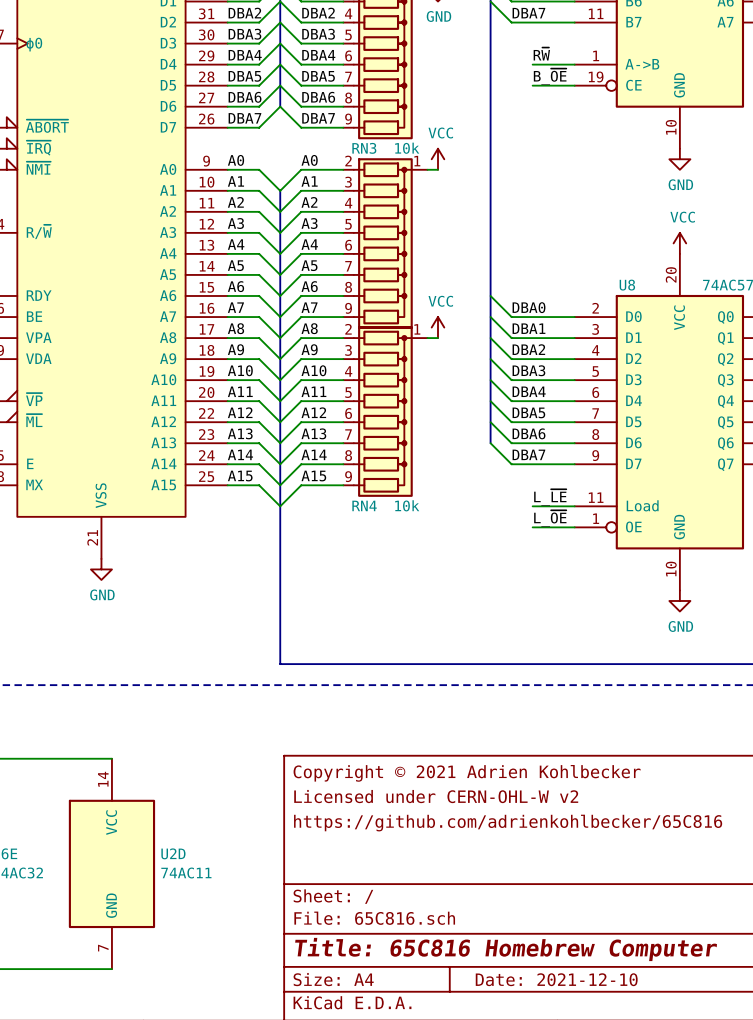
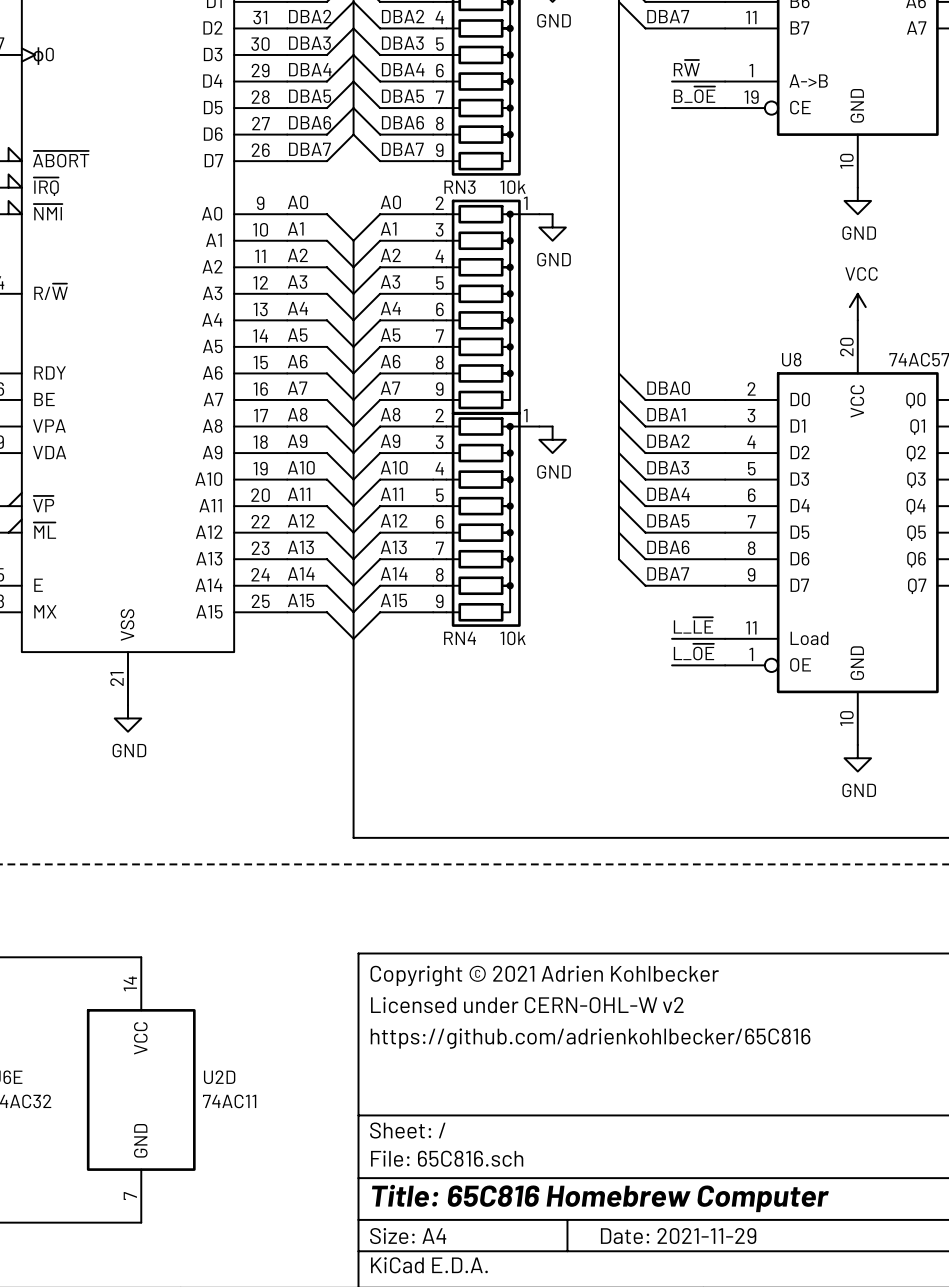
power symbol: VCC (438, 159) -> none
power symbol: none -> GND (552, 227)
power symbol: VCC (438, 327) -> none
power symbol: none -> GND (552, 439)
title block: Date: 2021-12-10 (556, 979) -> Date: 2021-11-29 (678, 1236)

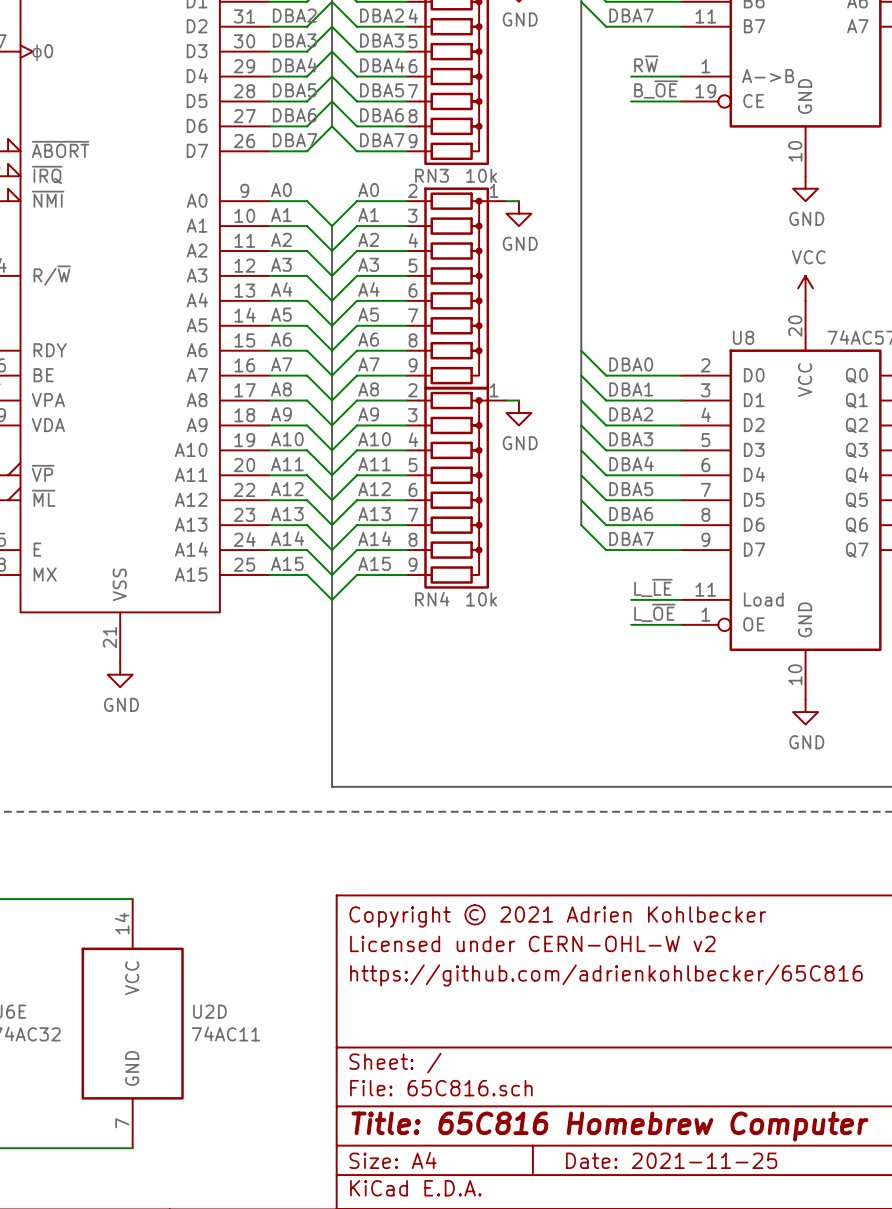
title block: Date: 2021-11-29 (678, 1236) -> Date: 2021-11-25 (671, 1160)

